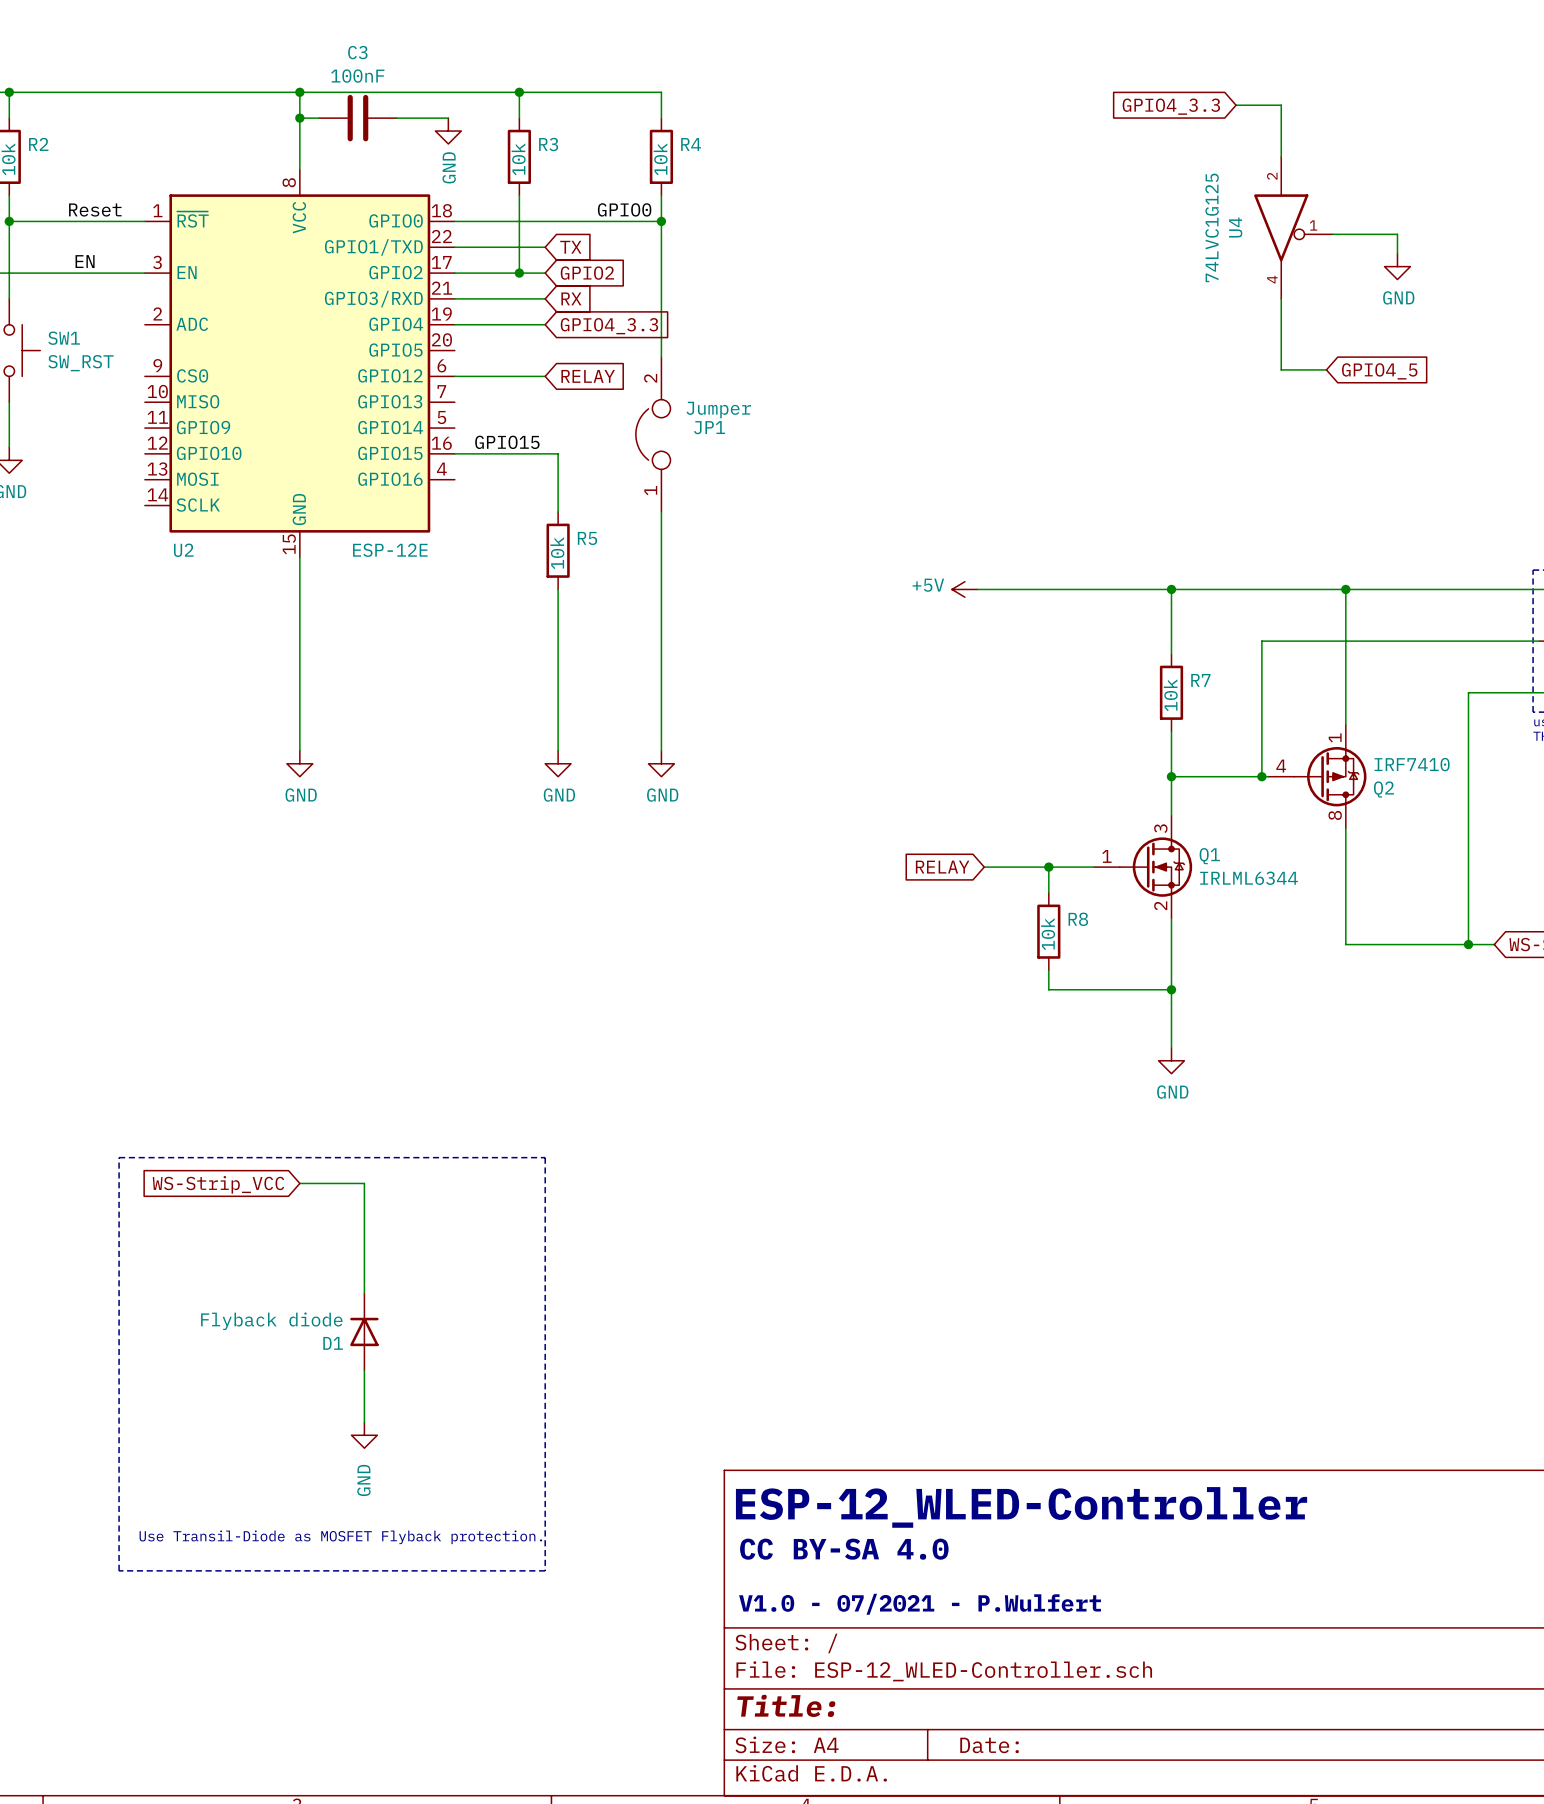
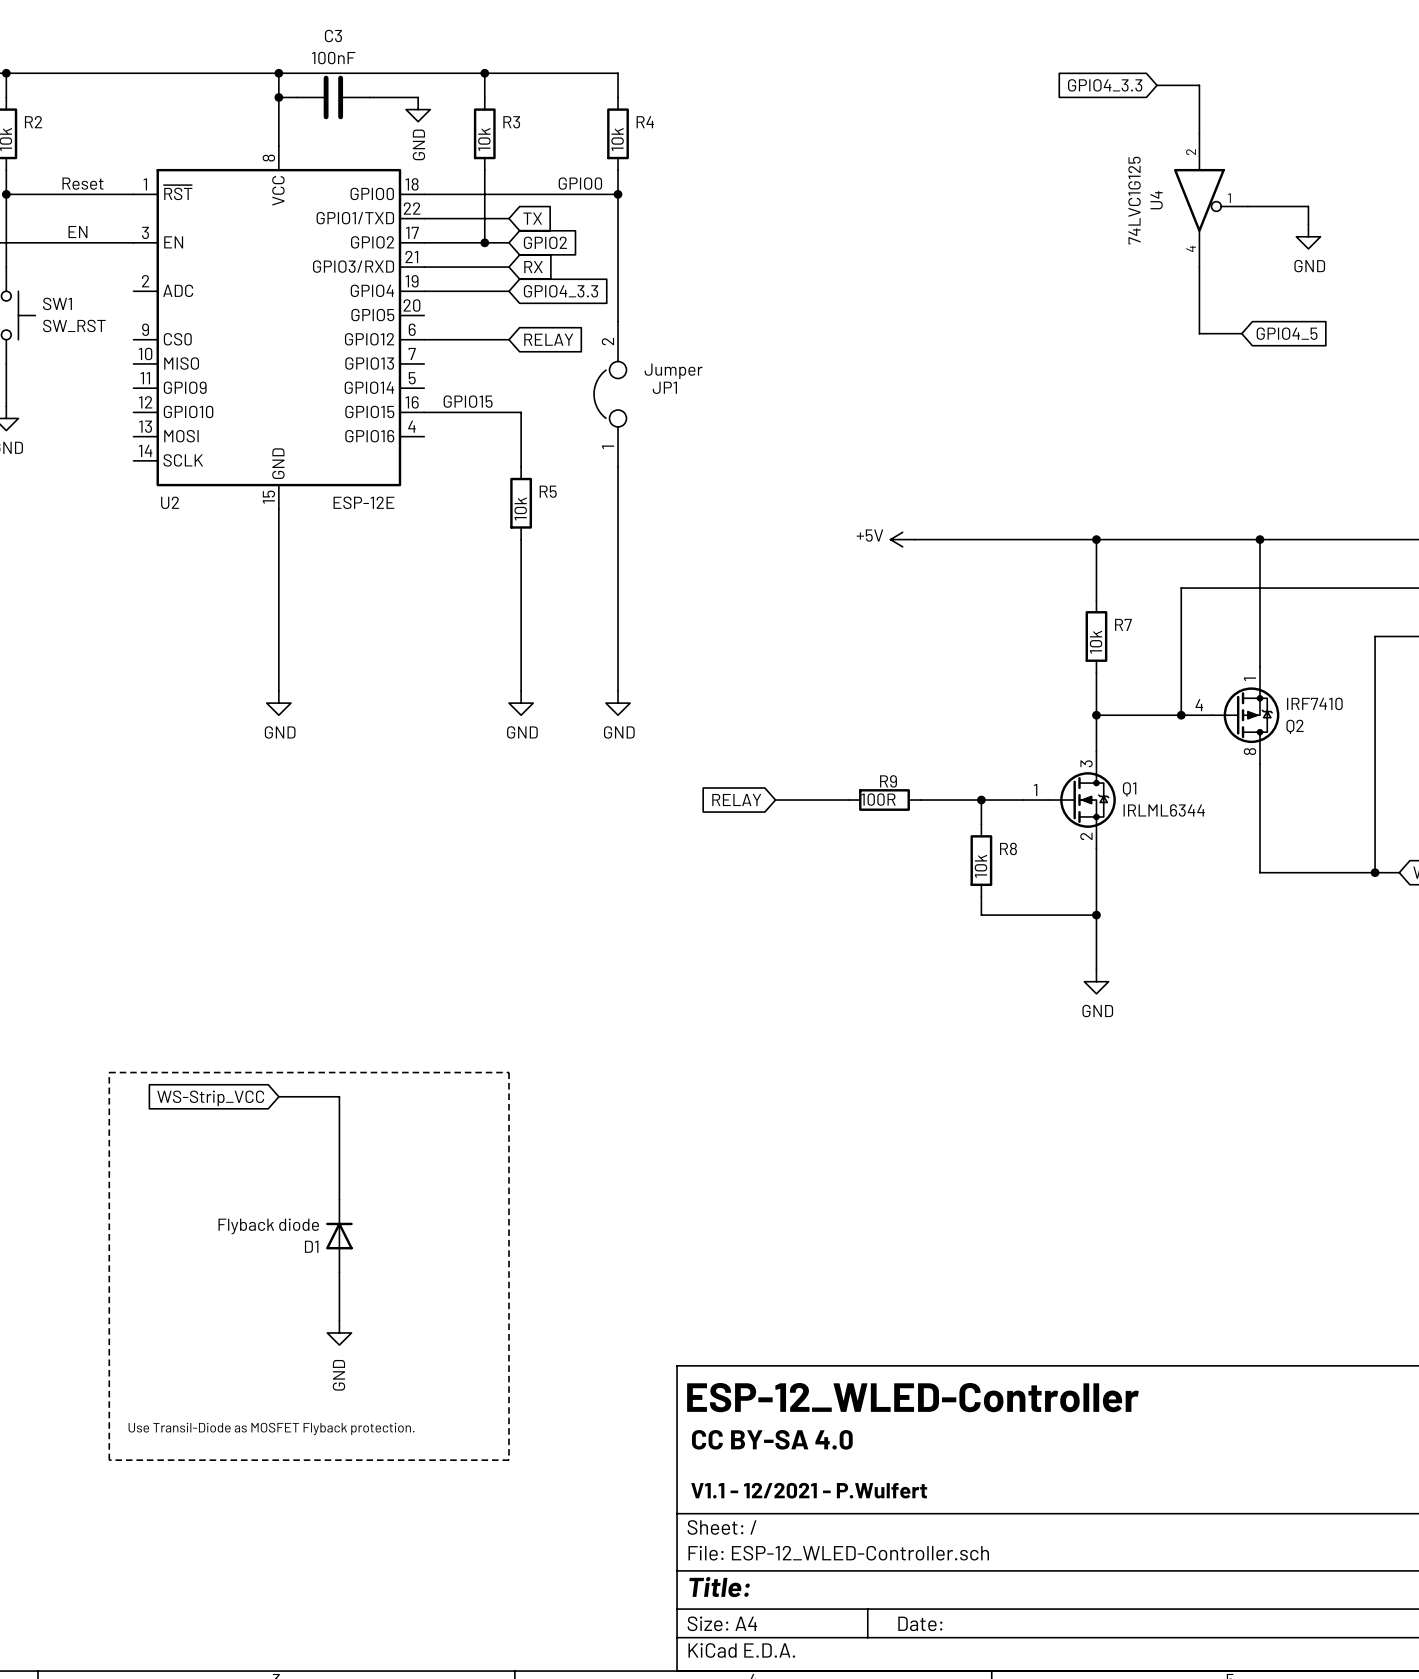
wire: none -> (775, 800) (848, 800)
global label position: RELAY (942, 867) -> RELAY (736, 800)
R9: none -> 100R (884, 800)
text: V1.0 - 07/2021 - P.Wulfert (920, 1604) -> V1.1 - 12/2021 - P.Wulfert (809, 1490)

